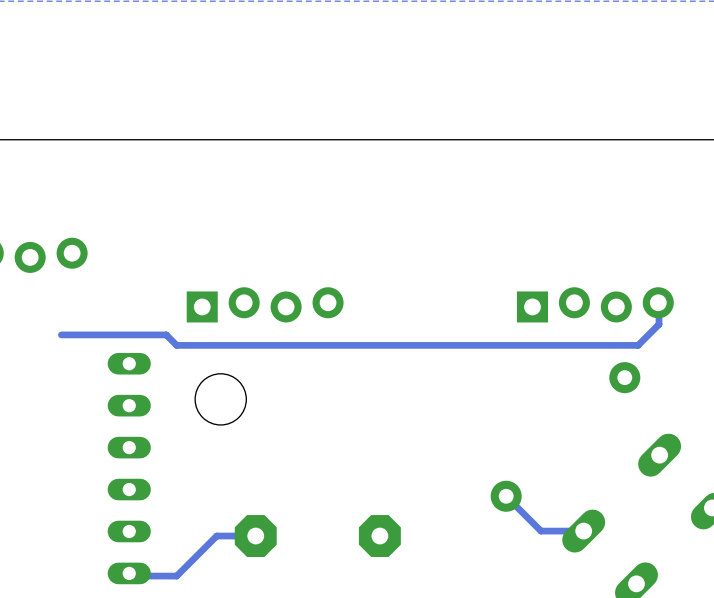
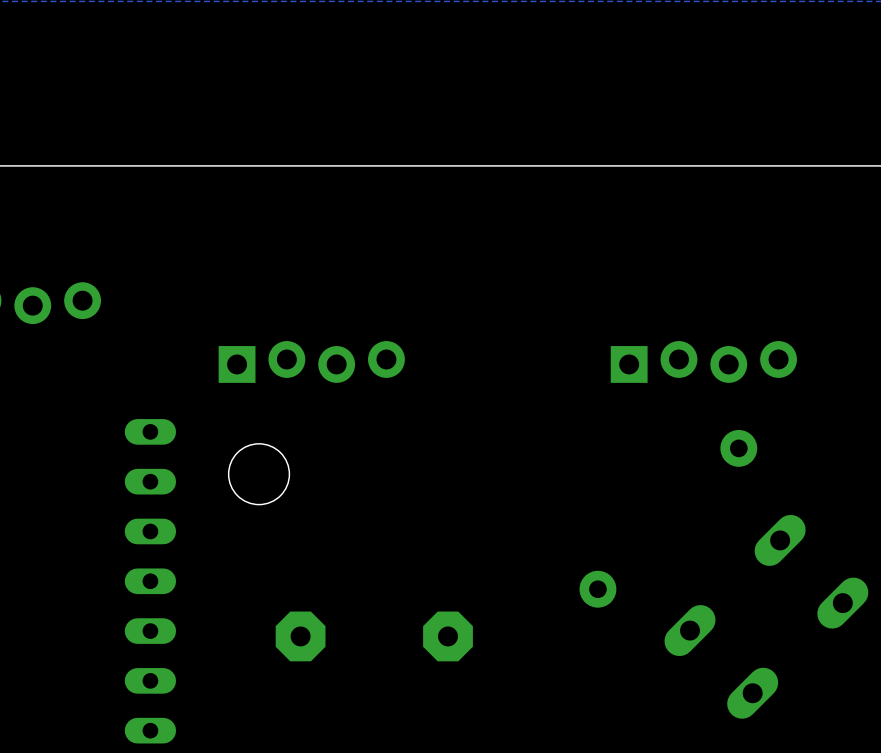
track: (658, 302) (659, 324) (638, 345) (176, 345) (166, 334) (61, 334) -> none
track: (506, 496) (540, 531) (583, 531) -> none
track: (255, 536) (216, 536) (176, 576) (131, 576) (129, 573) -> none

